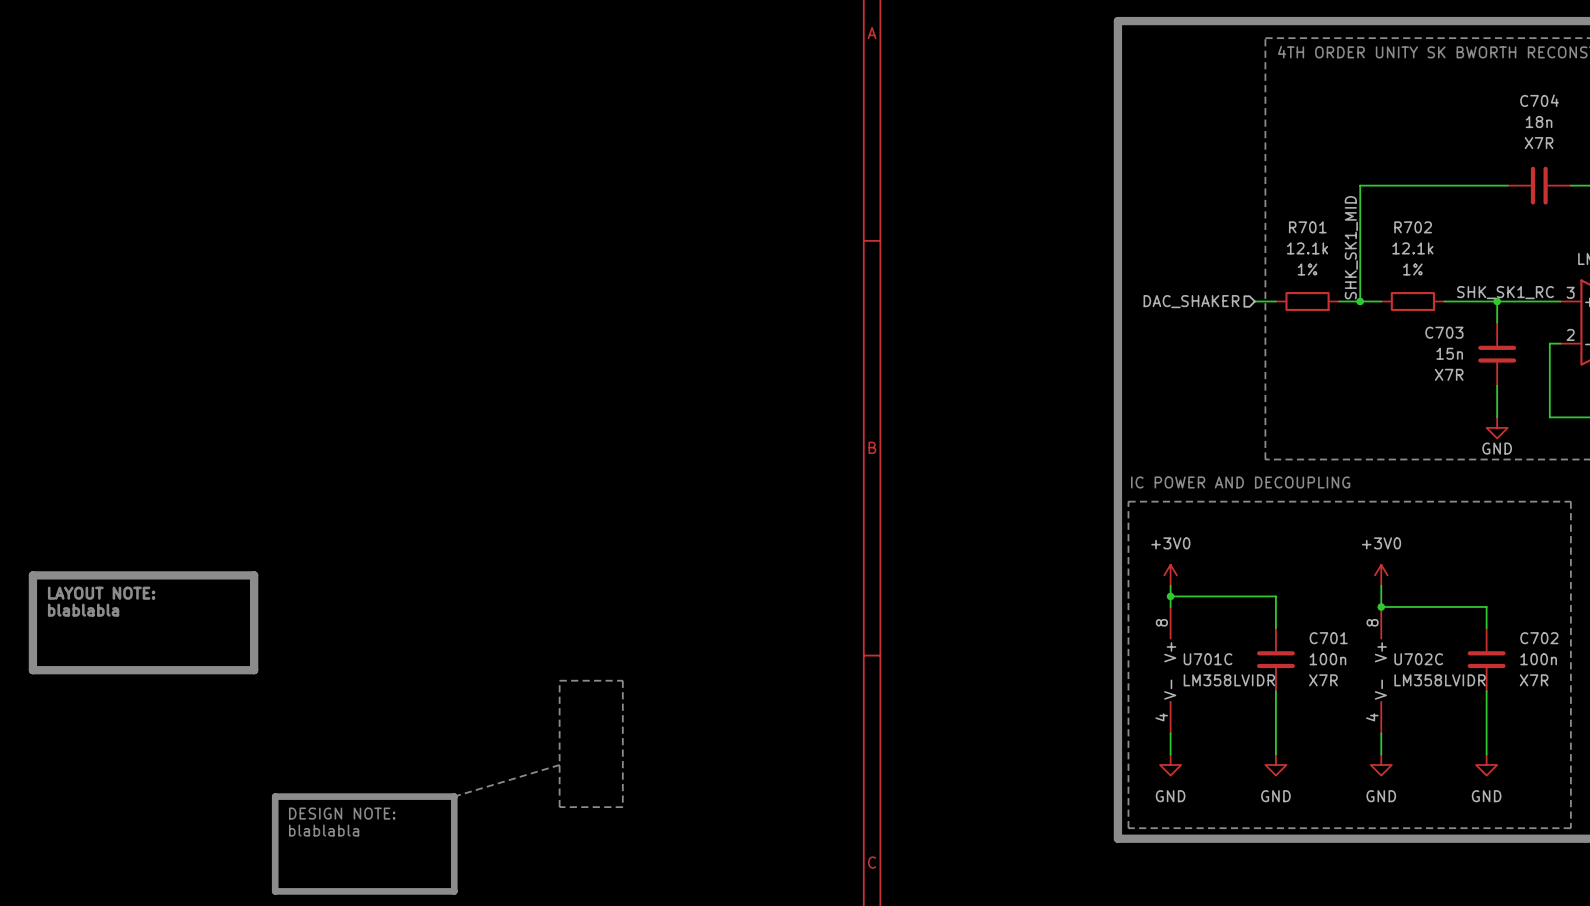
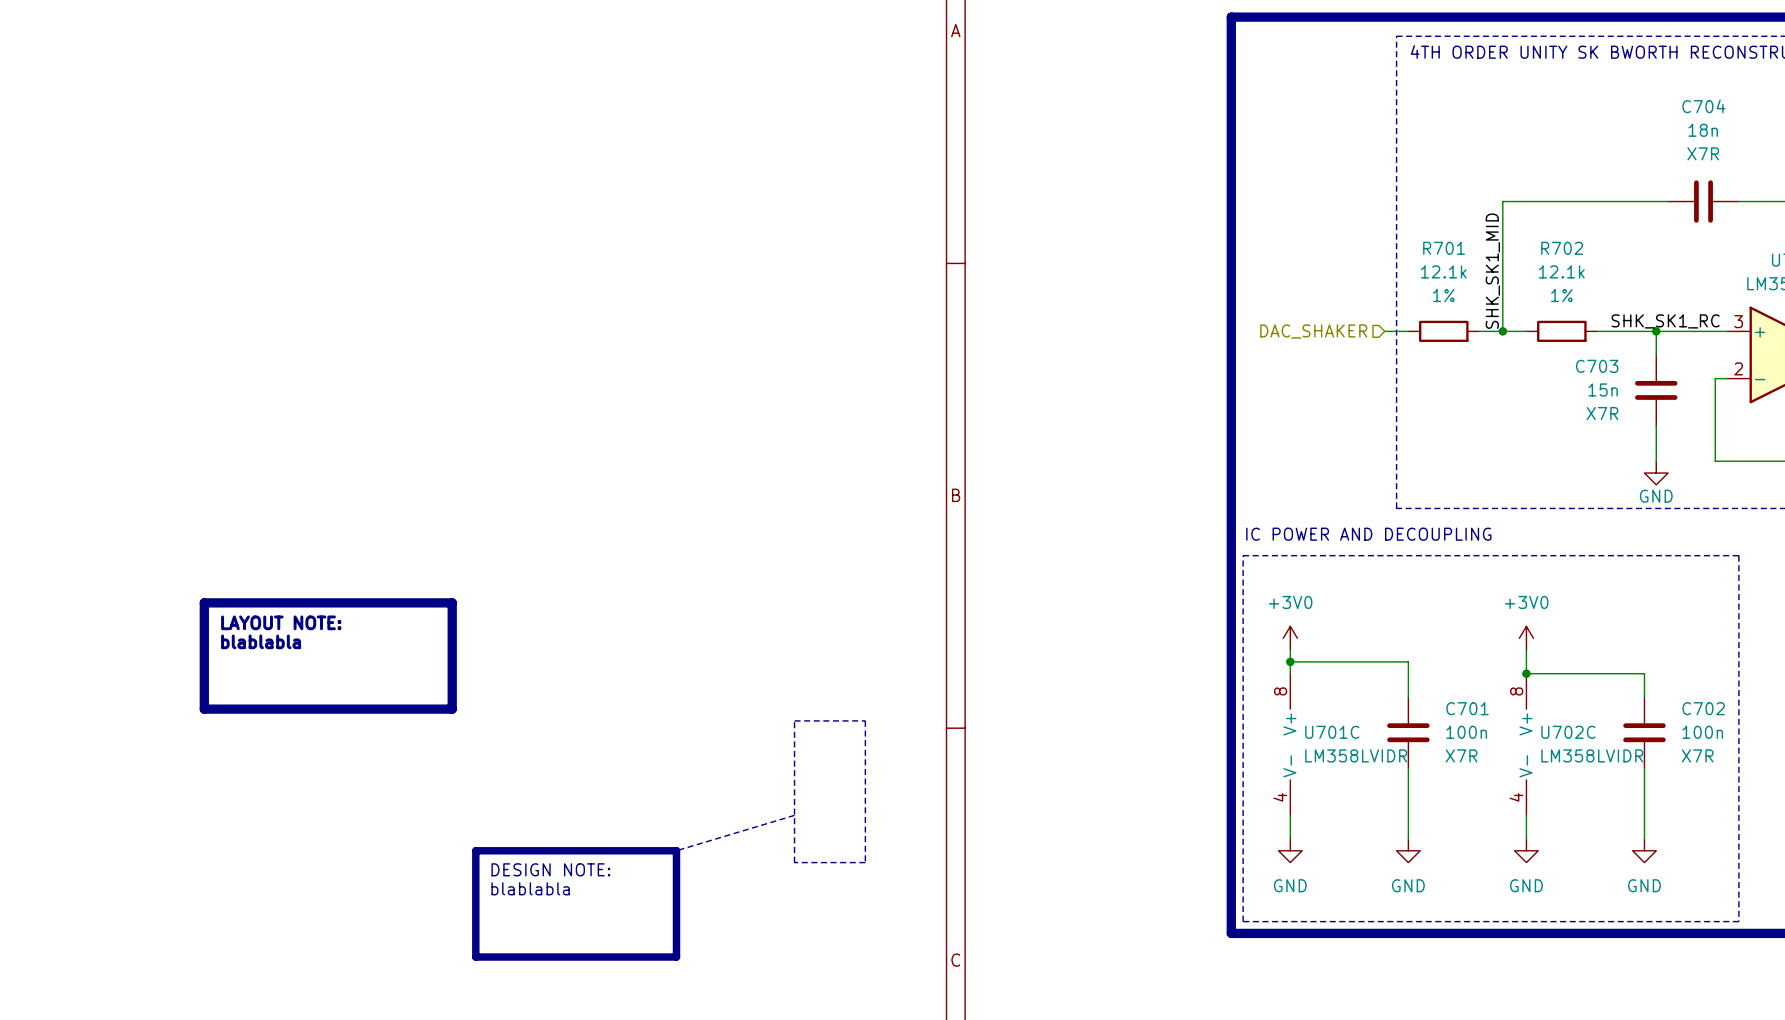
line: (32, 575) (254, 575) (254, 670) (32, 670) (32, 575) -> (204, 602) (452, 602) (452, 709) (204, 709) (204, 602)
text: none -> blablabla (261, 641)
text position: LAYOUT NOTE: (101, 593) -> LAYOUT NOTE: (281, 622)
text: blablabla (83, 610) -> none
line: (559, 680) (622, 680) (622, 807) (559, 807) (559, 680) -> (794, 720) (865, 720) (865, 862) (794, 862) (794, 720)
line: (559, 764) (454, 796) -> (794, 815) (676, 850)
line: (454, 796) (275, 796) (275, 891) (454, 891) (454, 796) -> (676, 850) (475, 850) (475, 957) (676, 957) (676, 850)
text: none -> blablabla (530, 888)
text position: DESIGN NOTE: (342, 813) -> DESIGN NOTE: (550, 869)
text: blablabla (324, 830) -> none

